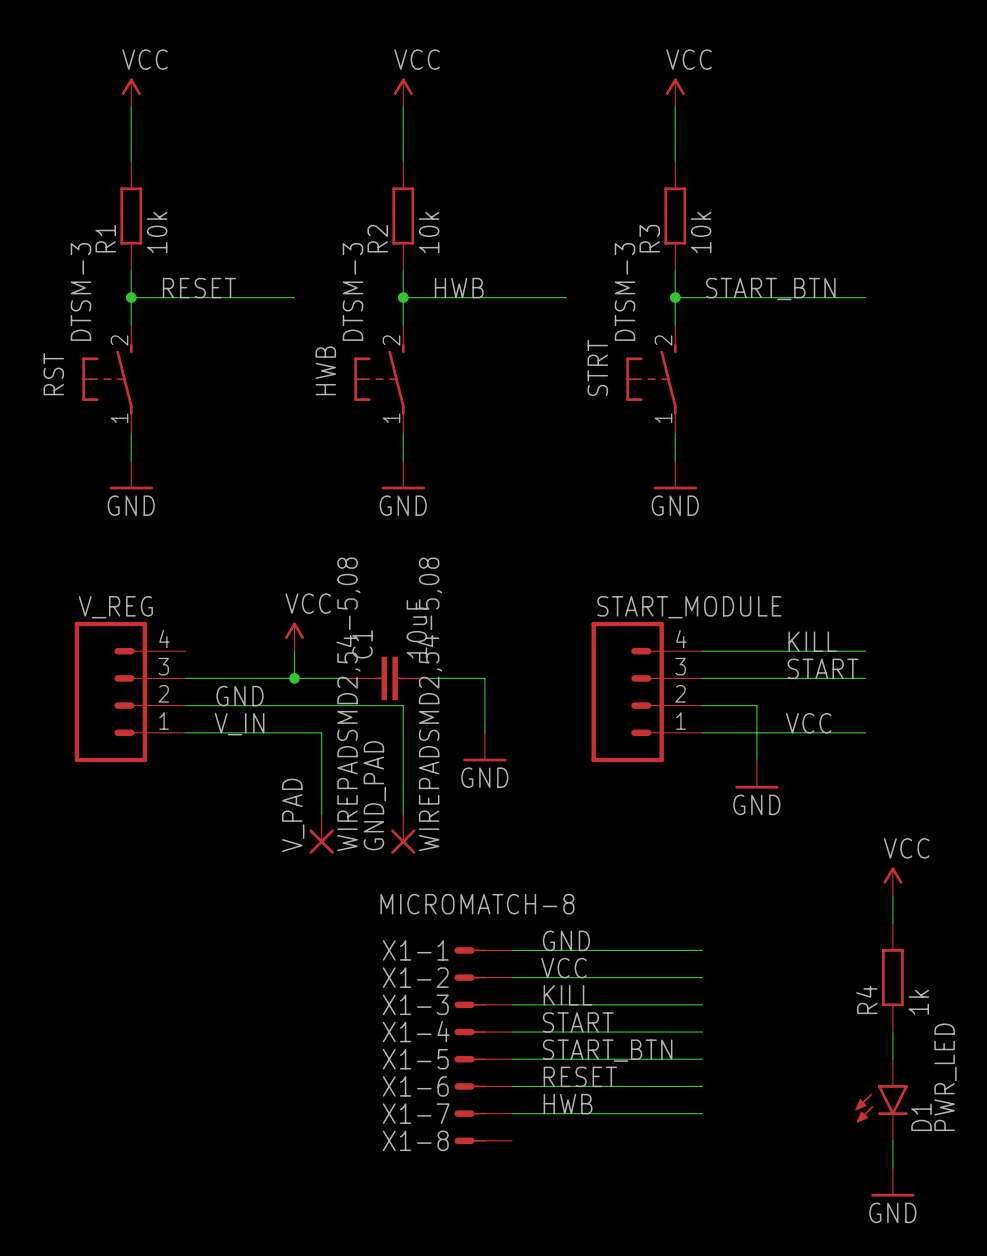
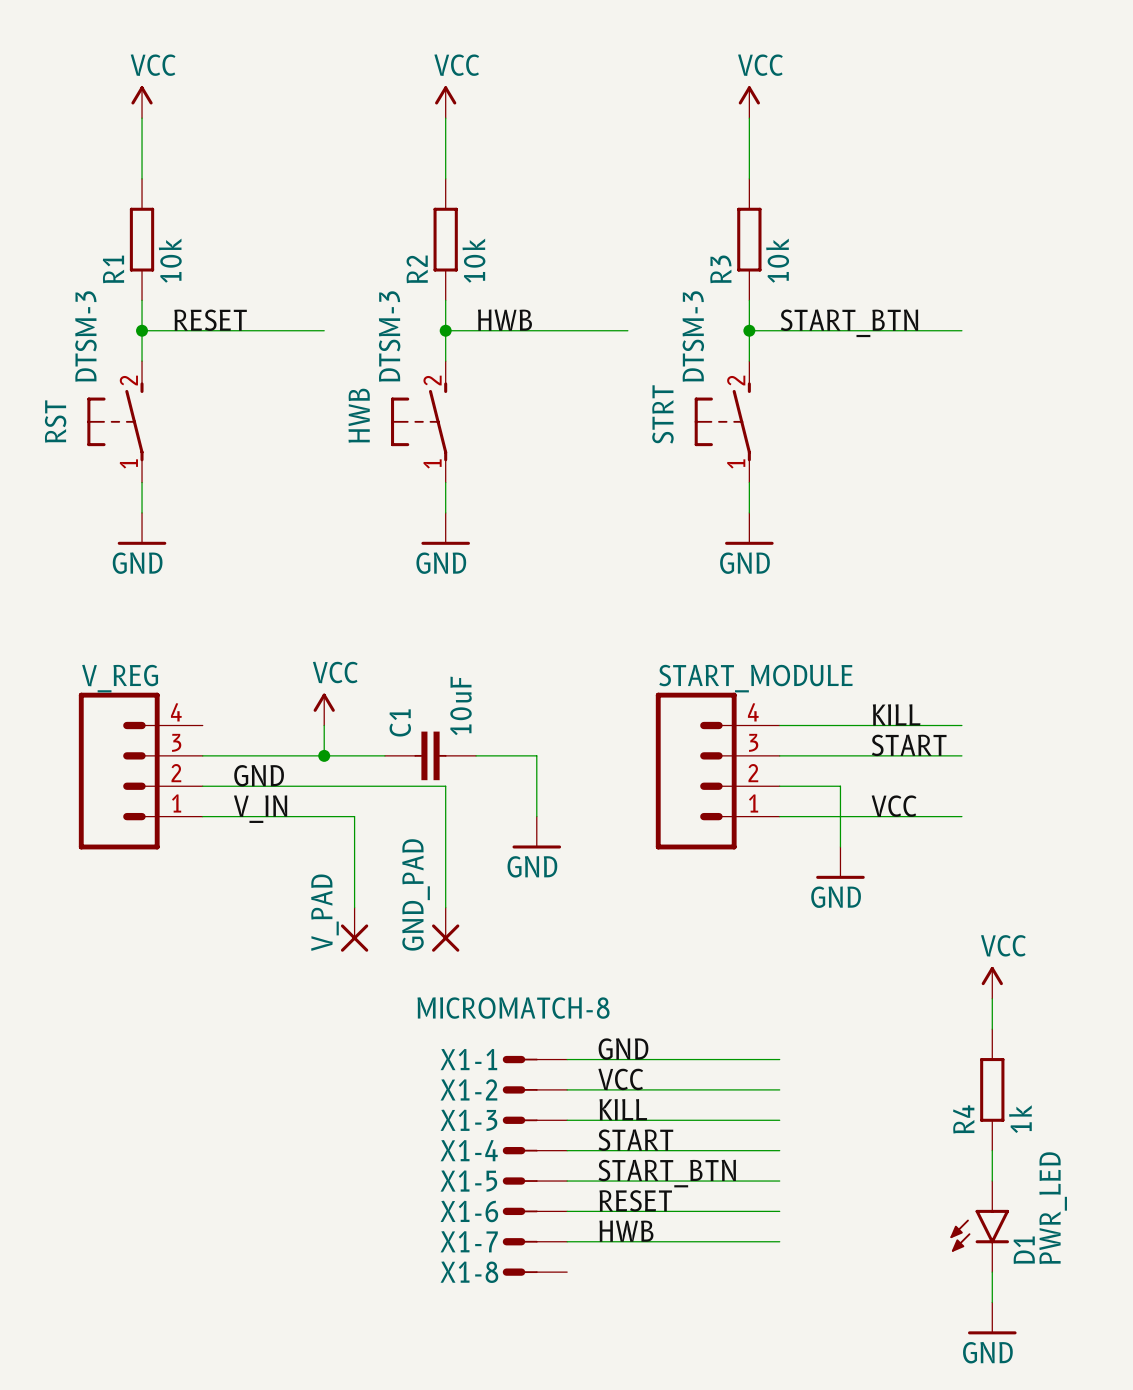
V_PAD value: WIREPADSMD2,54-5,08 (348, 704) -> none
GND_PAD value: WIREPADSMD2,54-5,08 (430, 704) -> none

